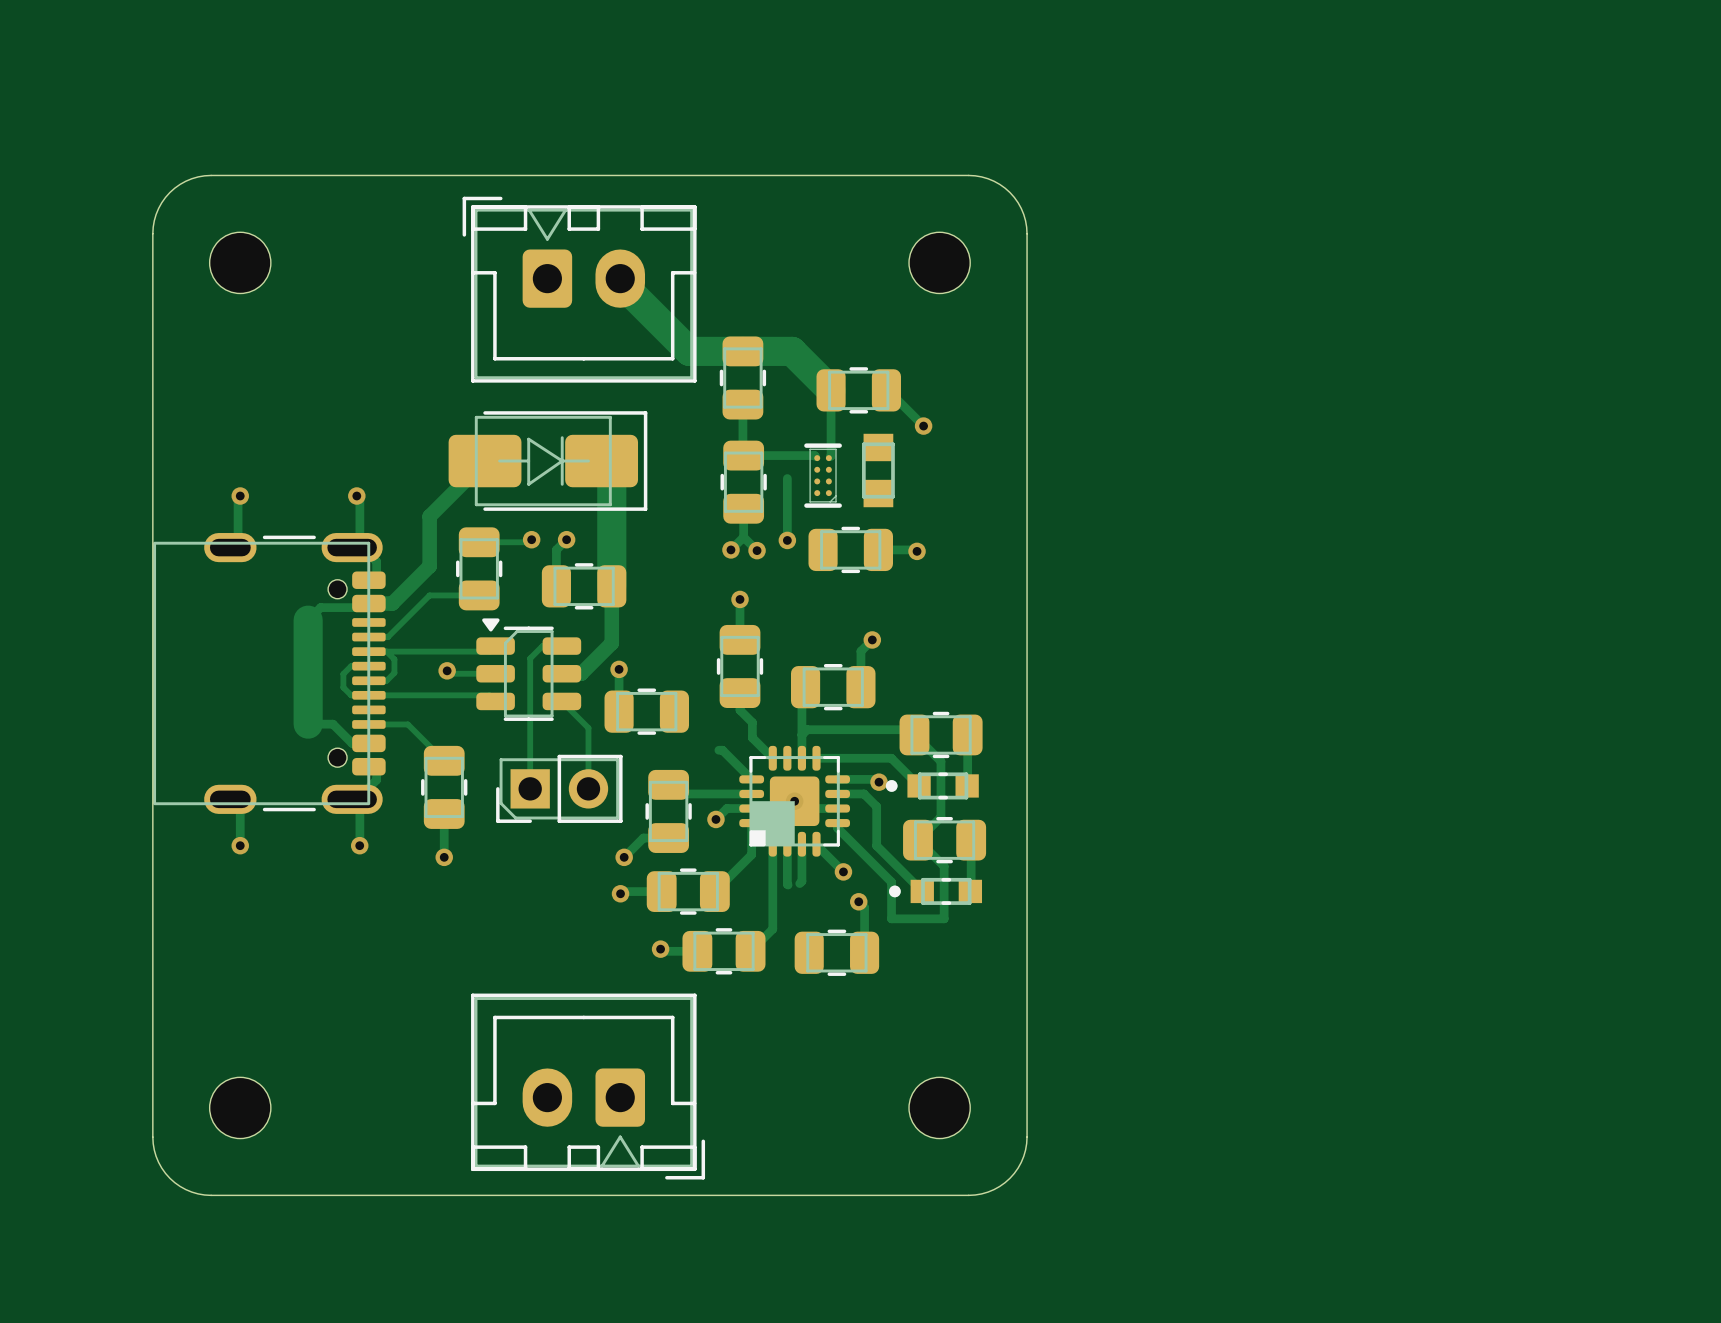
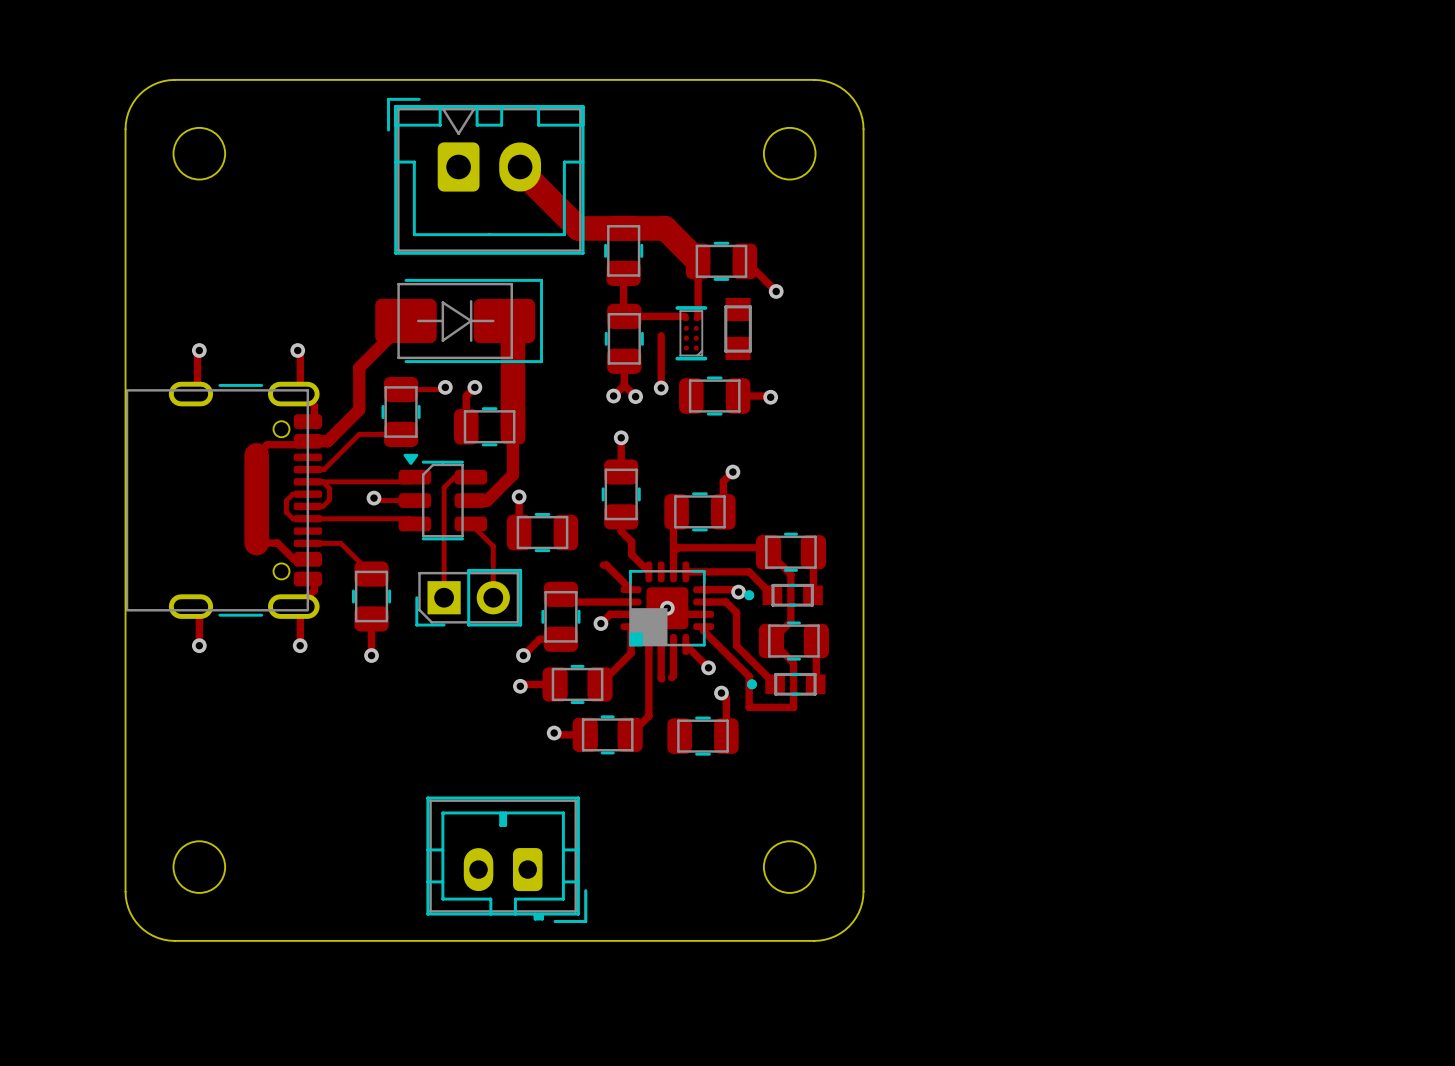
part footprint: [471, 993, 706, 1180] -> [426, 796, 588, 923]

